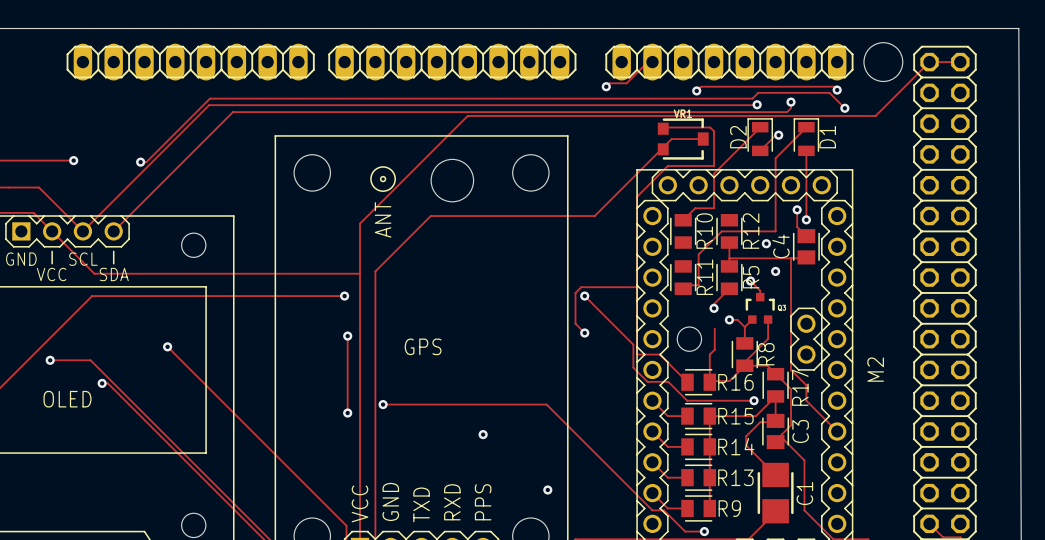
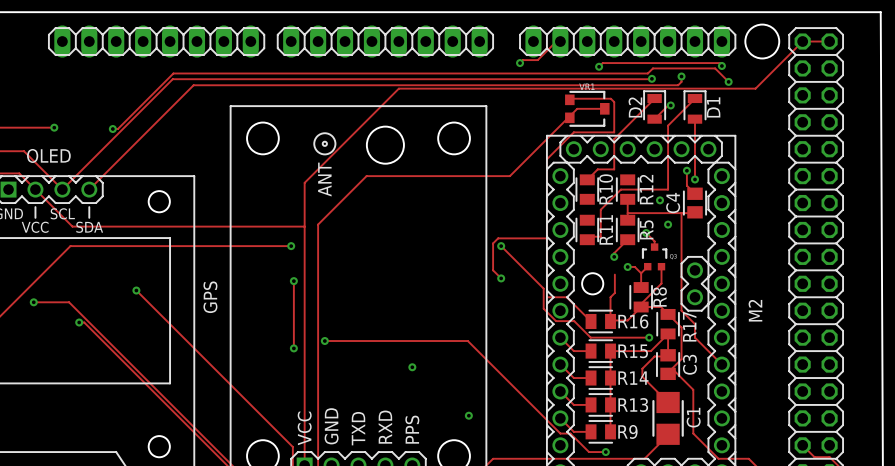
GPS name rotation: 0° (423, 346) -> 90° counterclockwise (210, 297)
GPS name position: GPS (423, 346) -> GPS (210, 297)
OLED name position: OLED (67, 399) -> OLED (48, 155)

